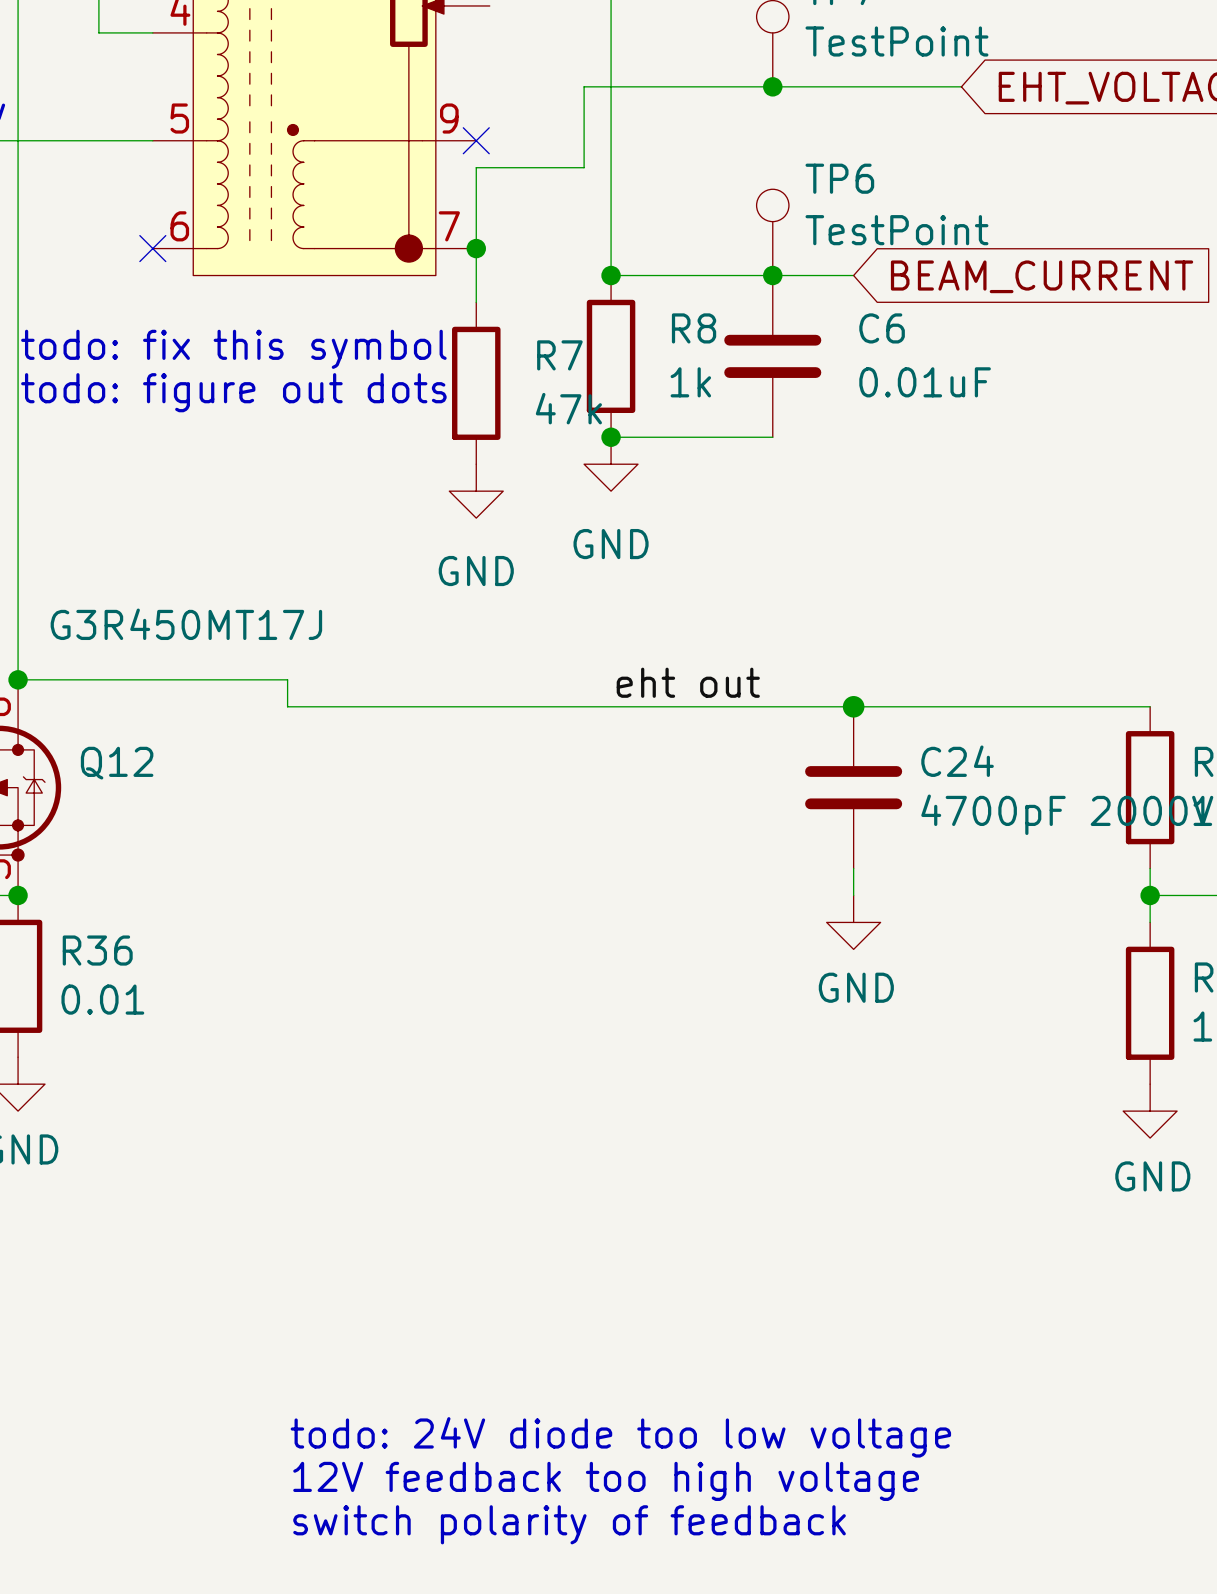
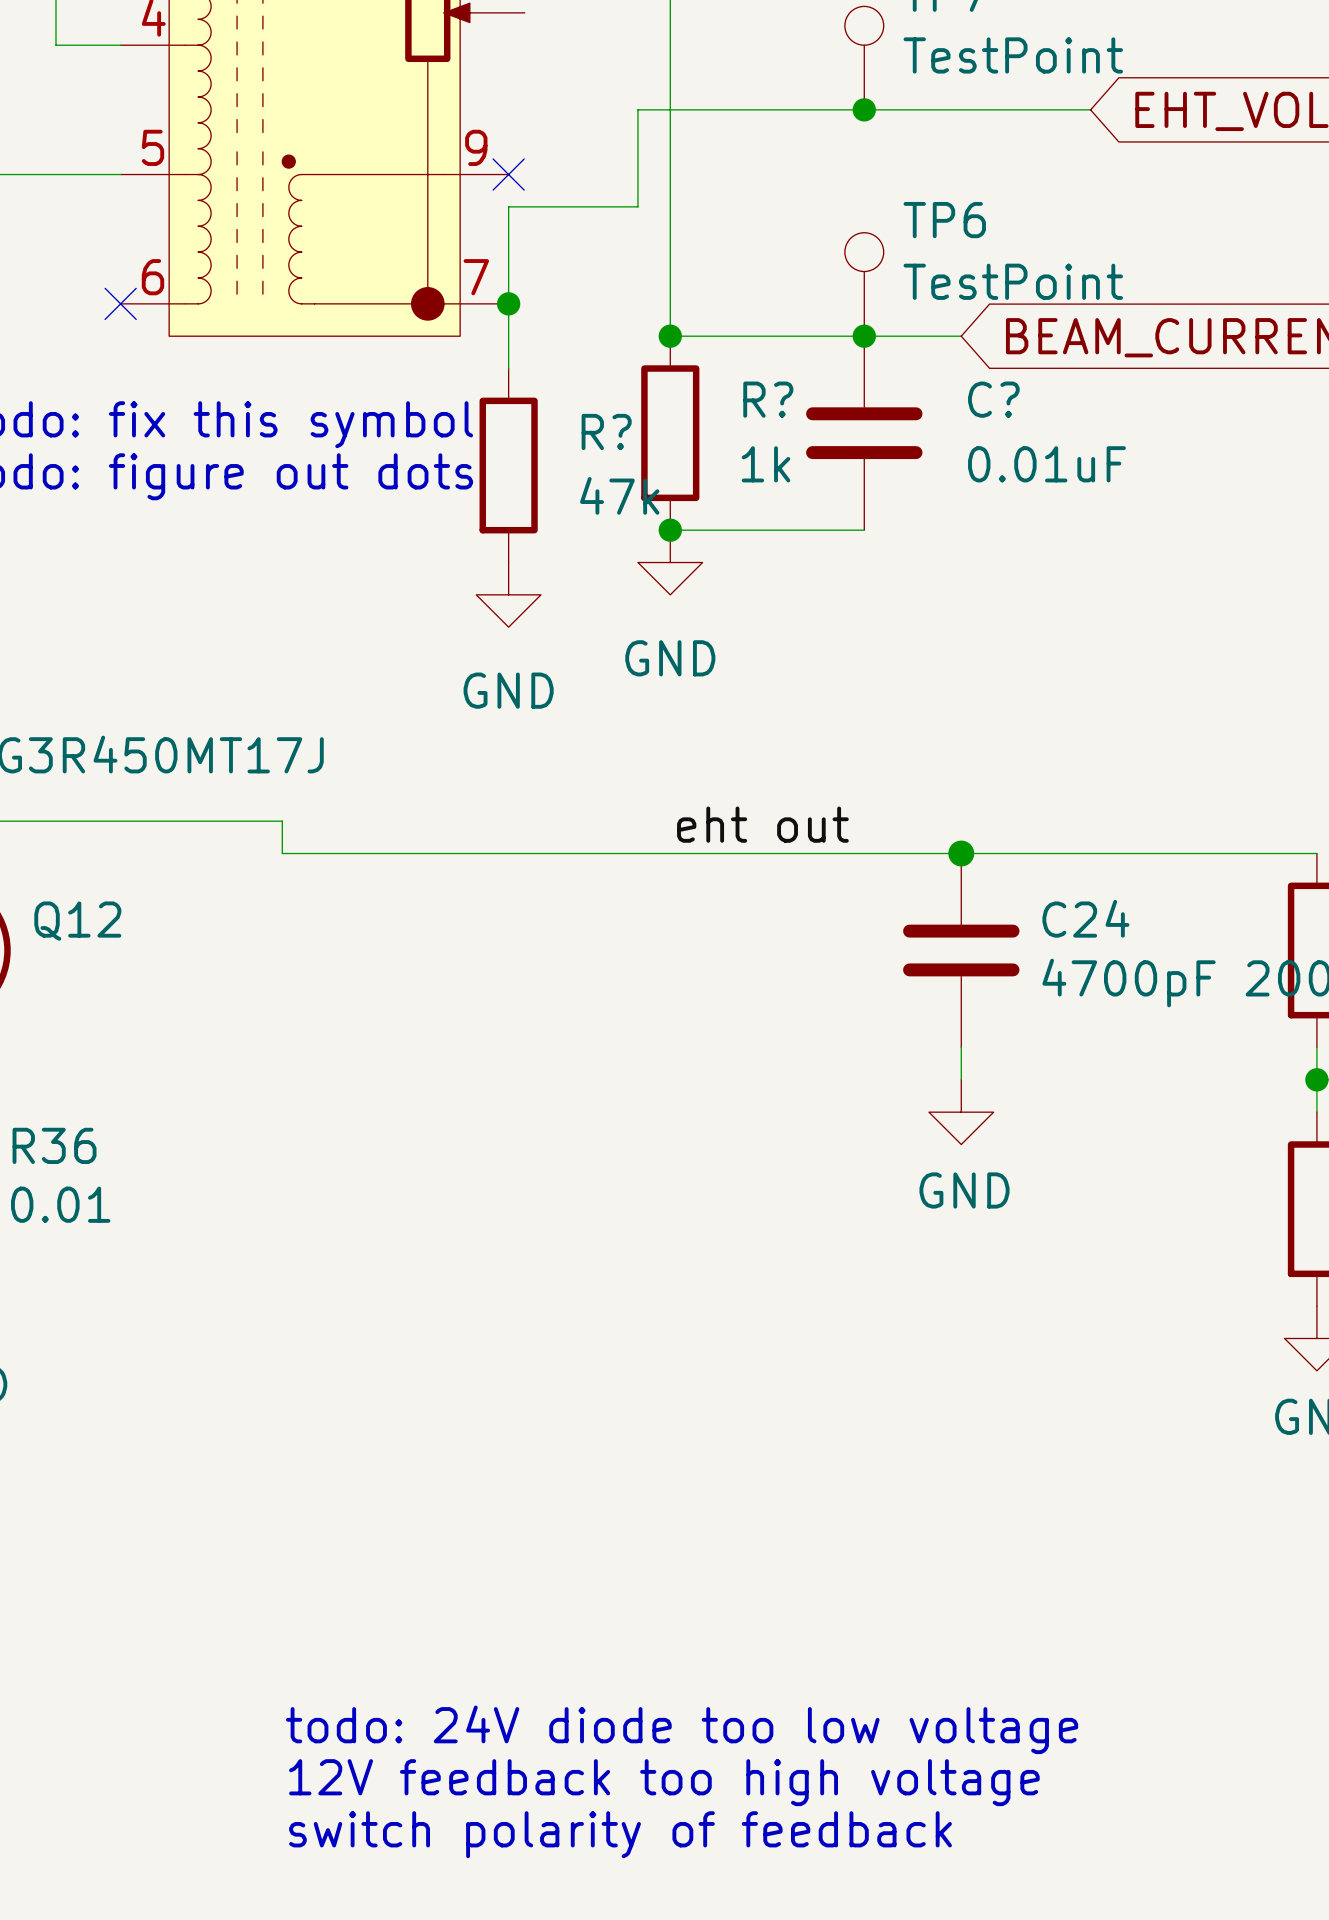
R8 name: R8 (694, 328) -> R? (768, 399)
C6 name: C6 (882, 328) -> C? (993, 399)
R7 name: R7 (559, 355) -> R? (606, 431)

